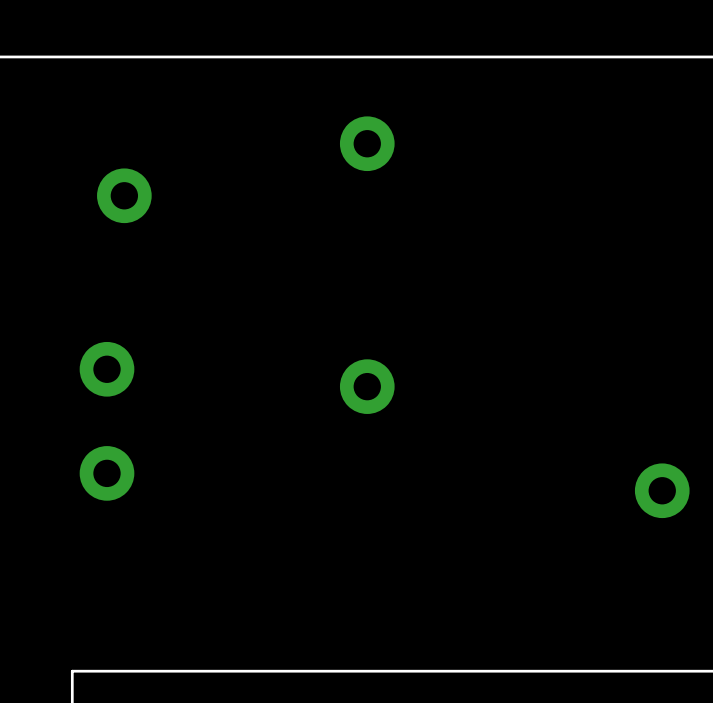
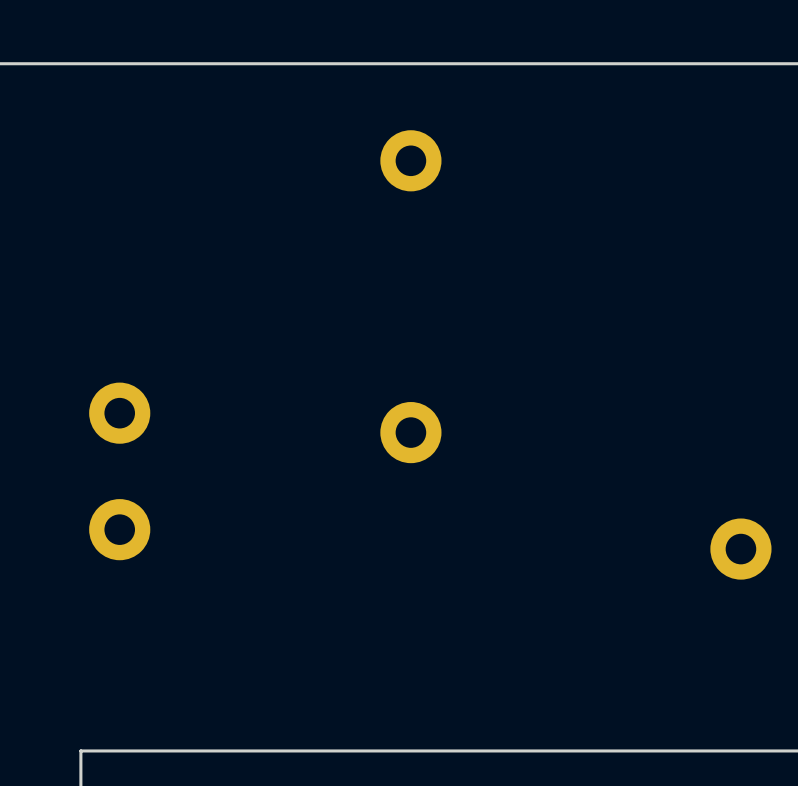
part: (124, 195) -> none

